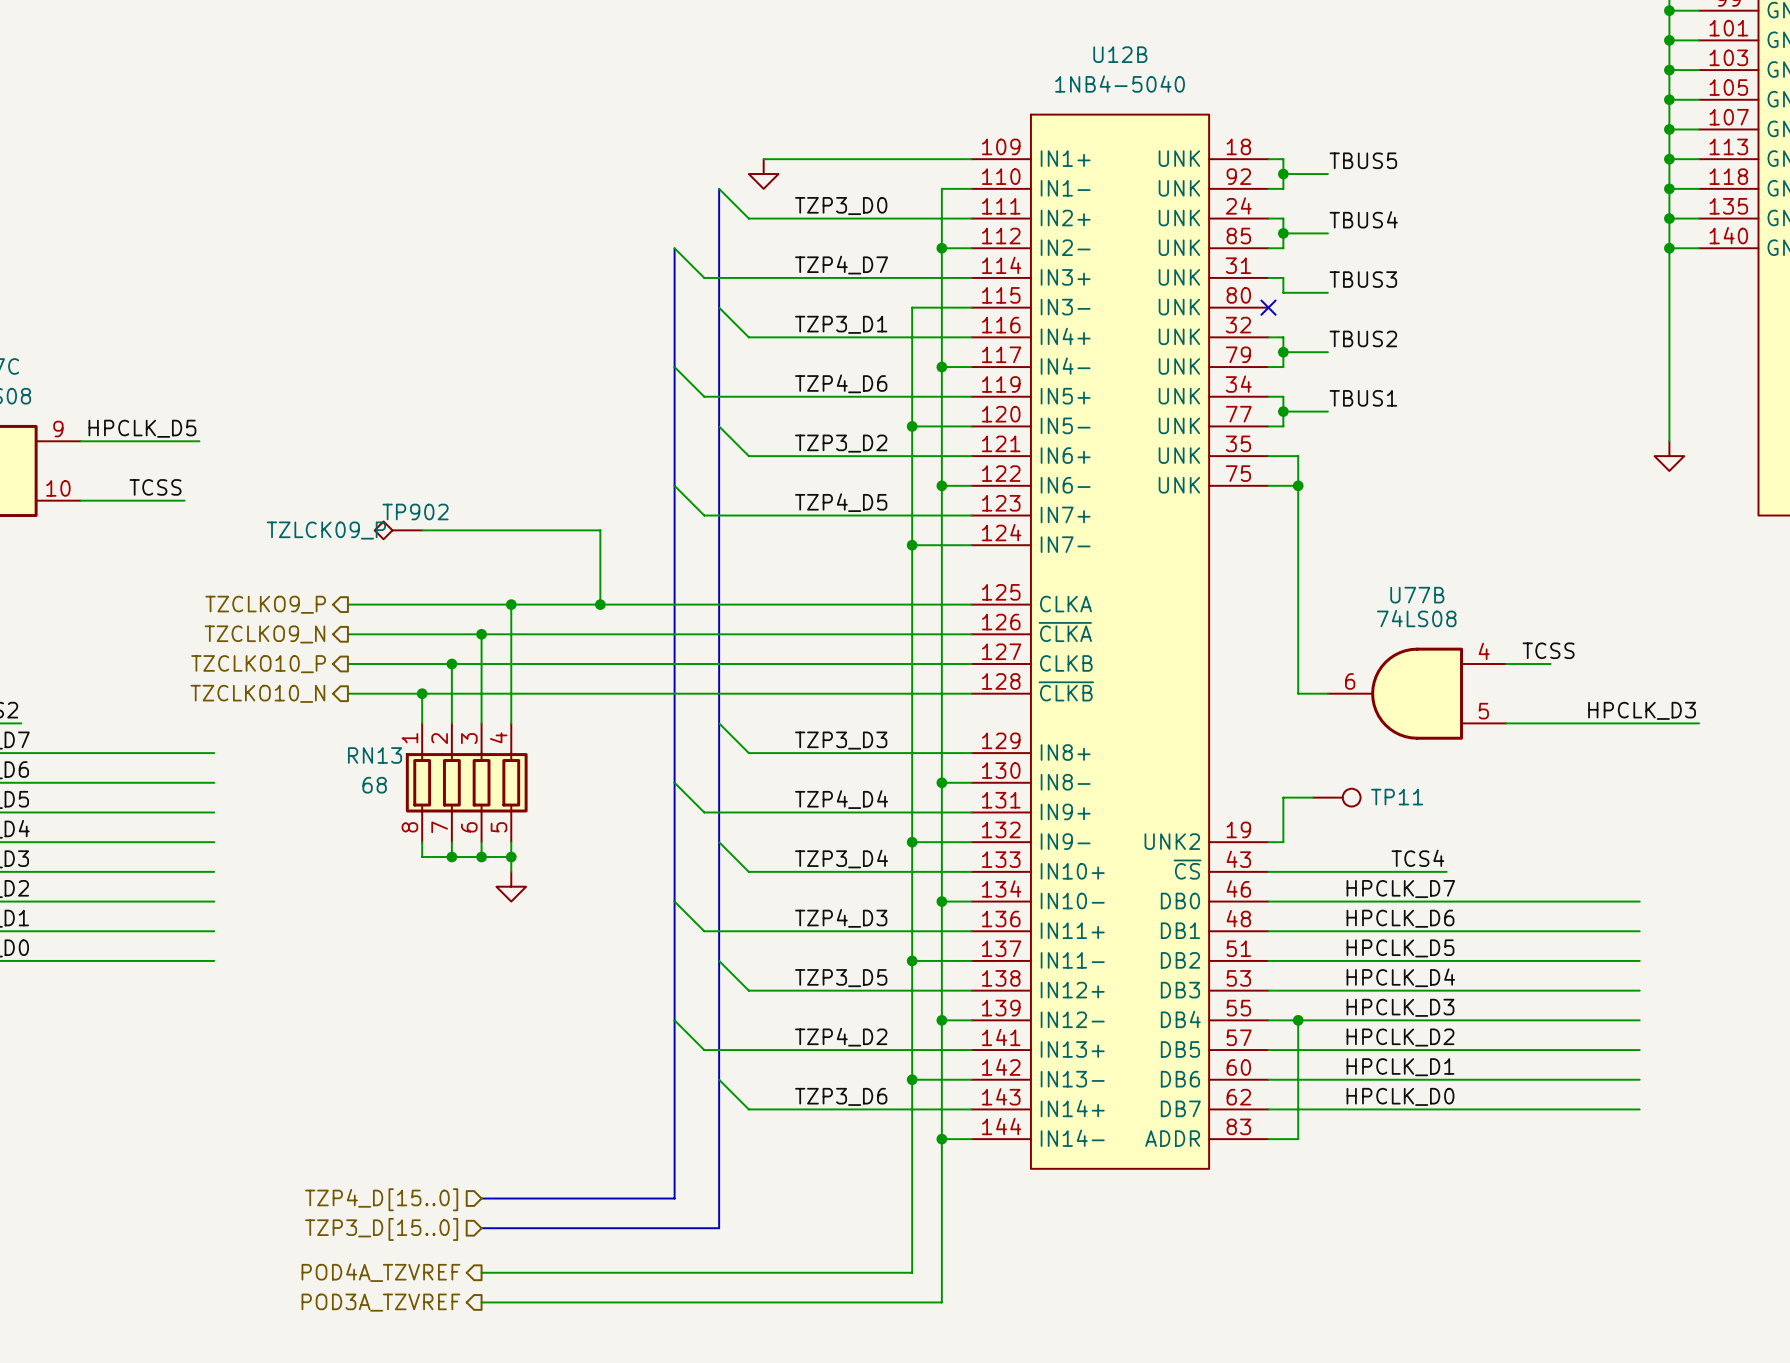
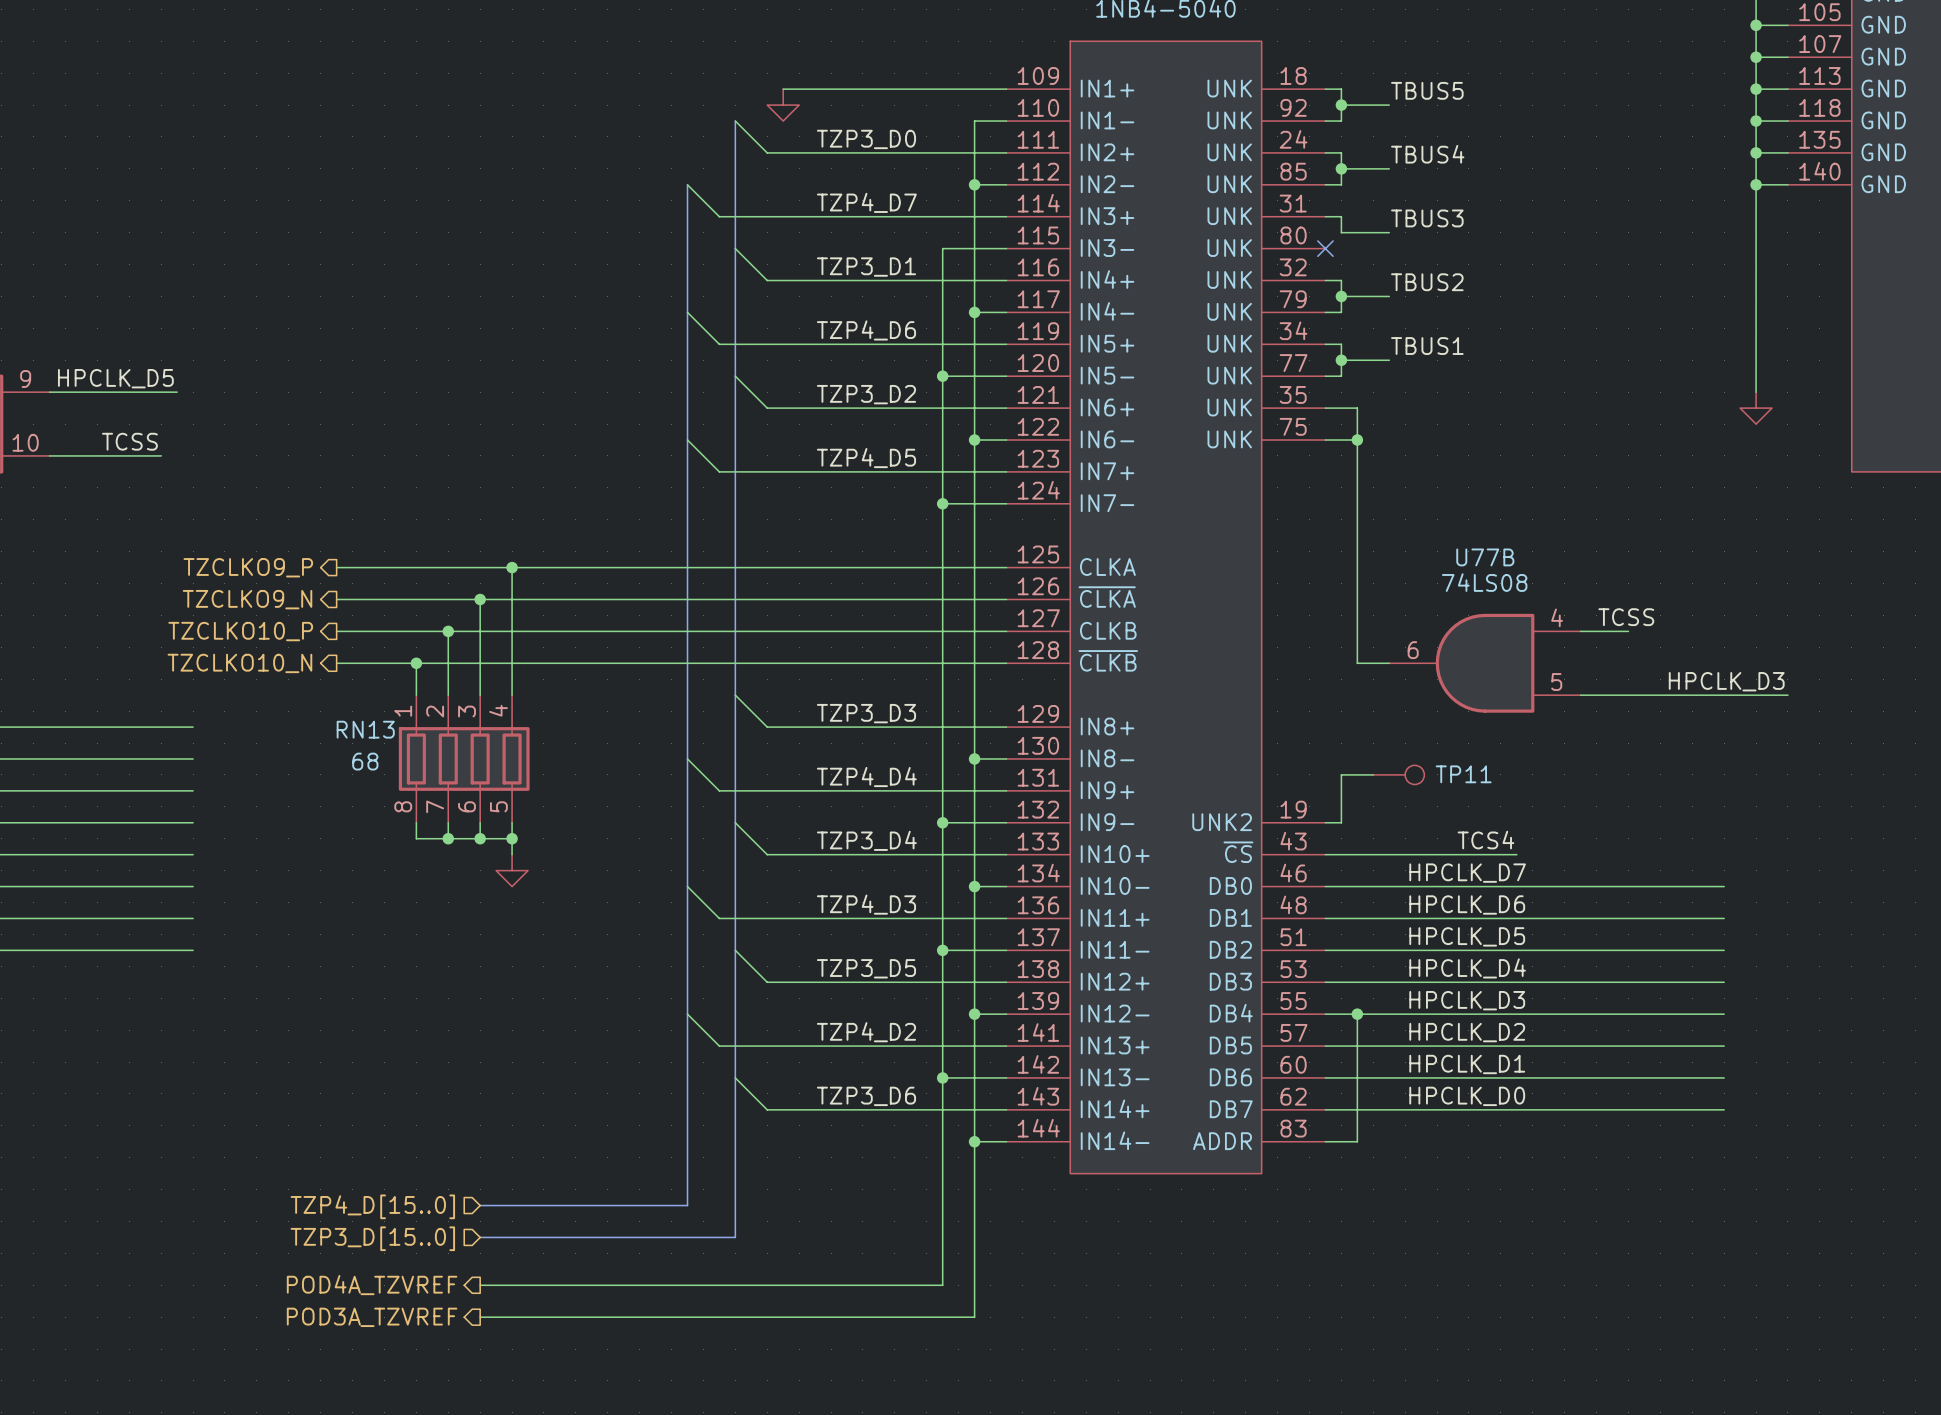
TP902: TZLCK09_P (398, 530) -> none
wire: (422, 530) (600, 530) (600, 604) -> none
junction: (600, 604) -> none

